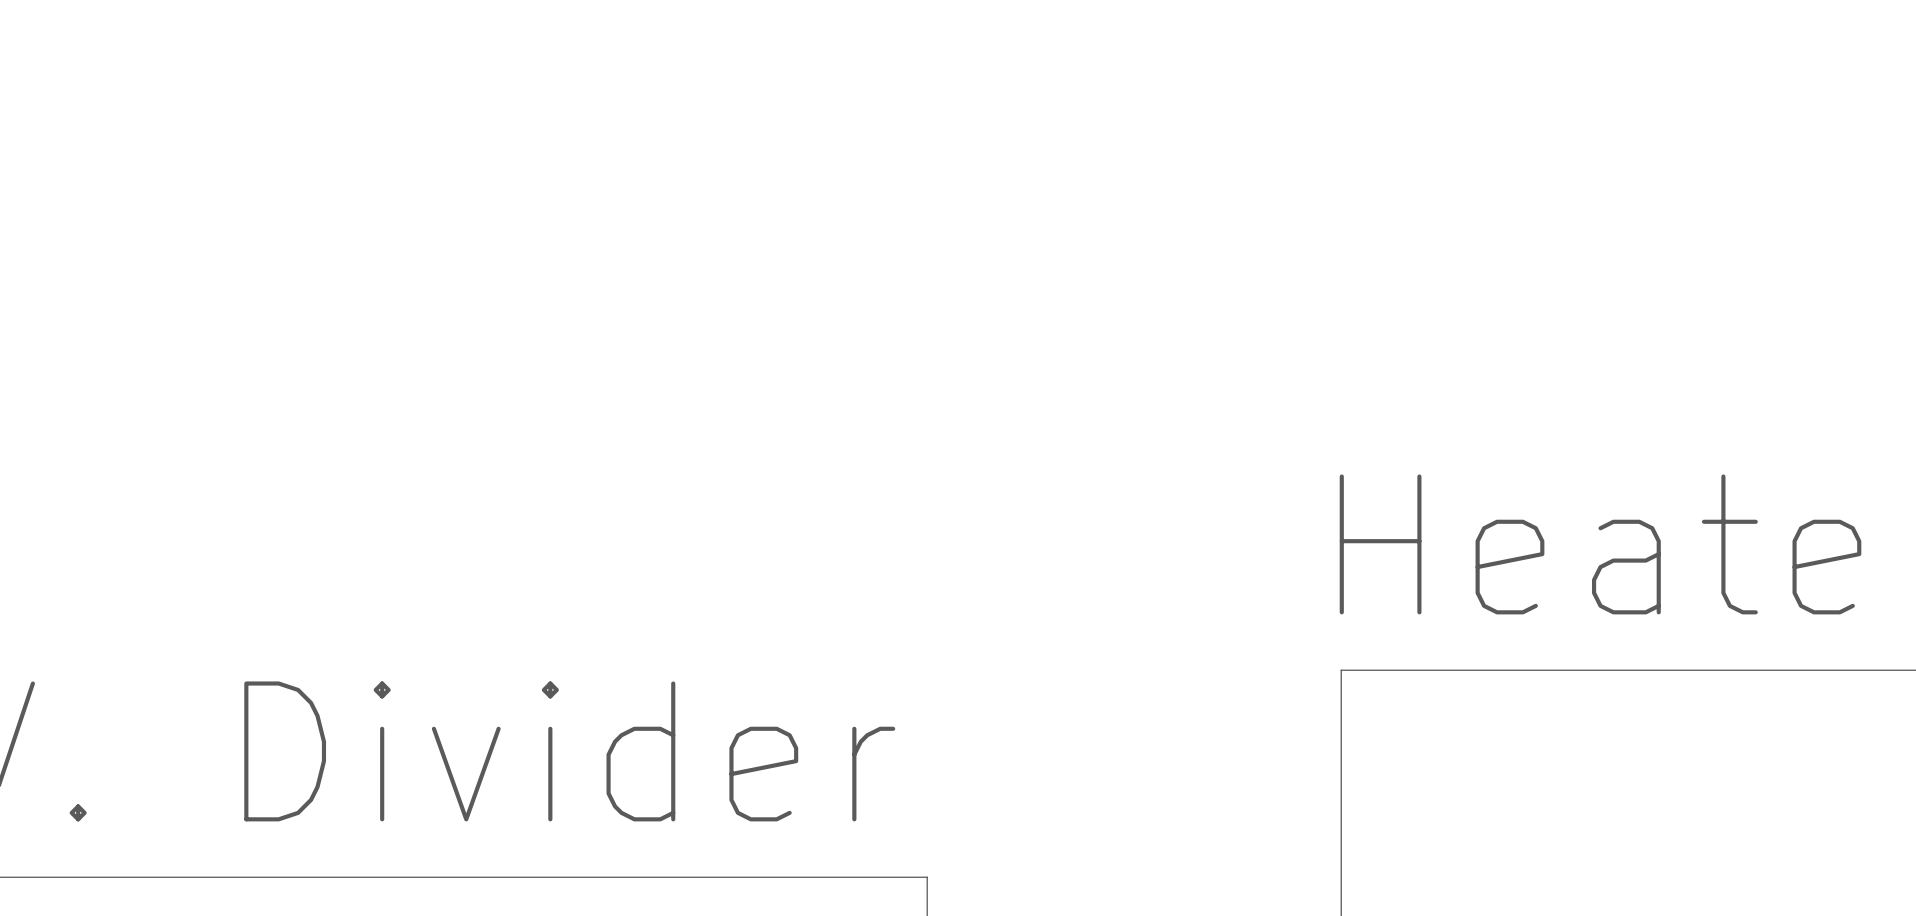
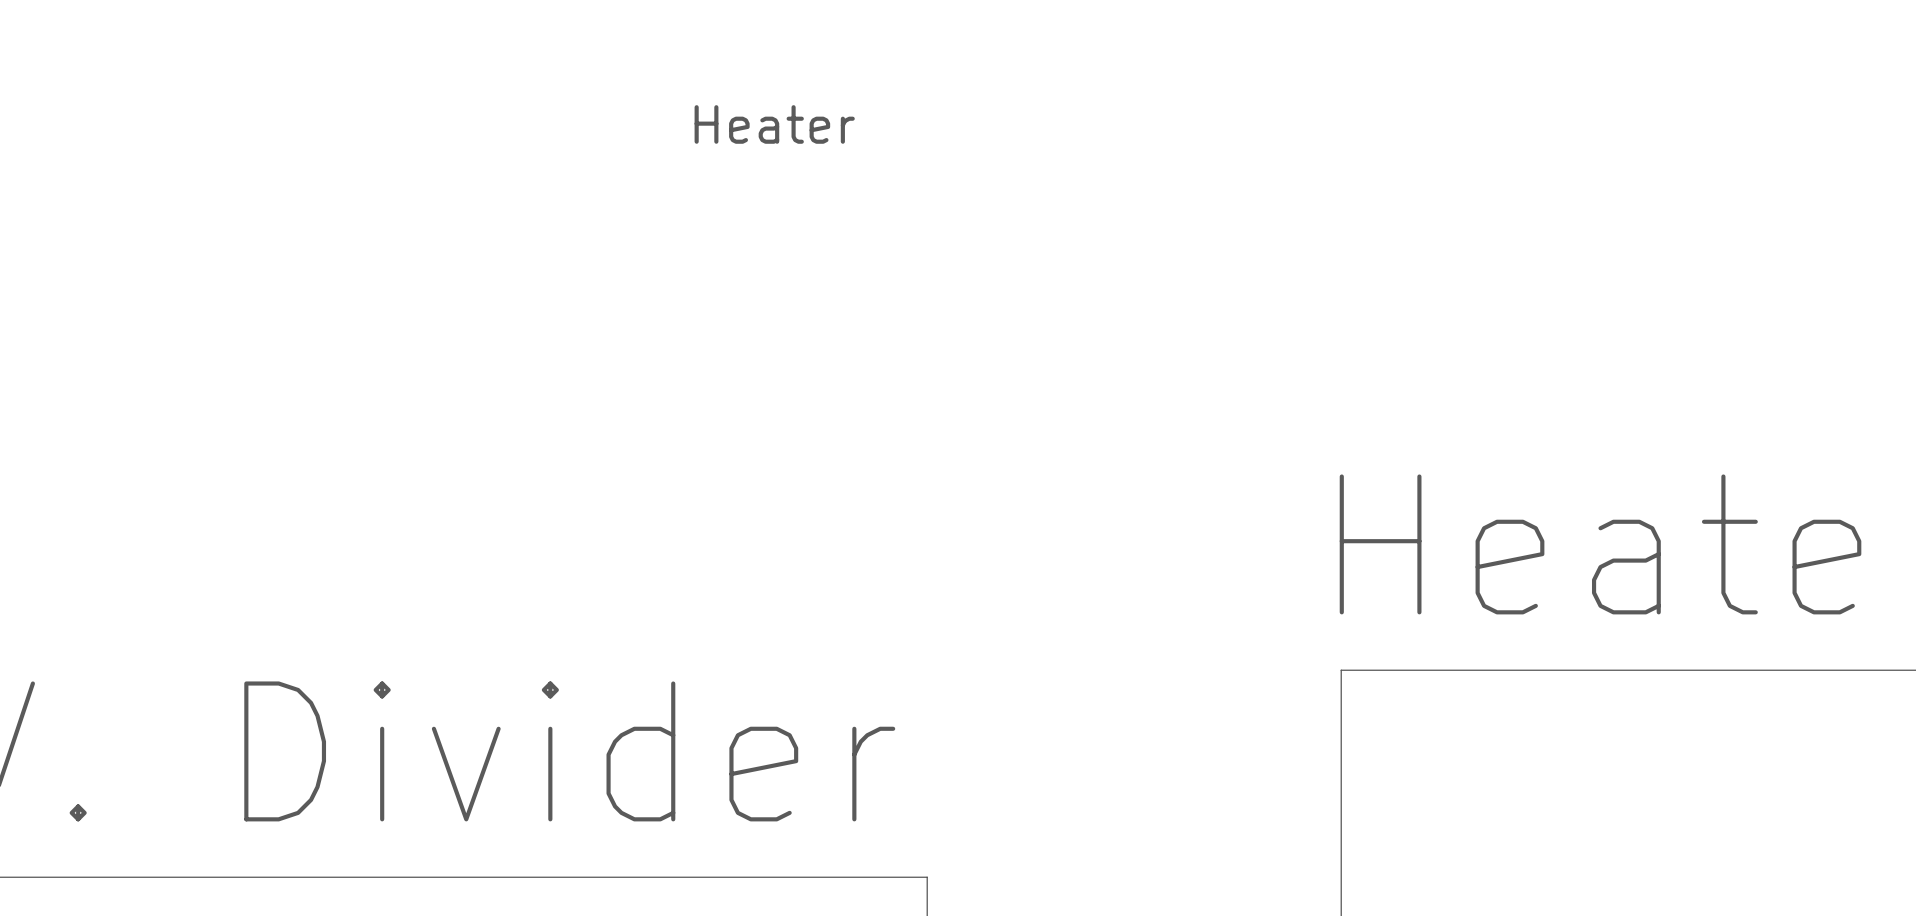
text: none -> Heater (774, 124)

